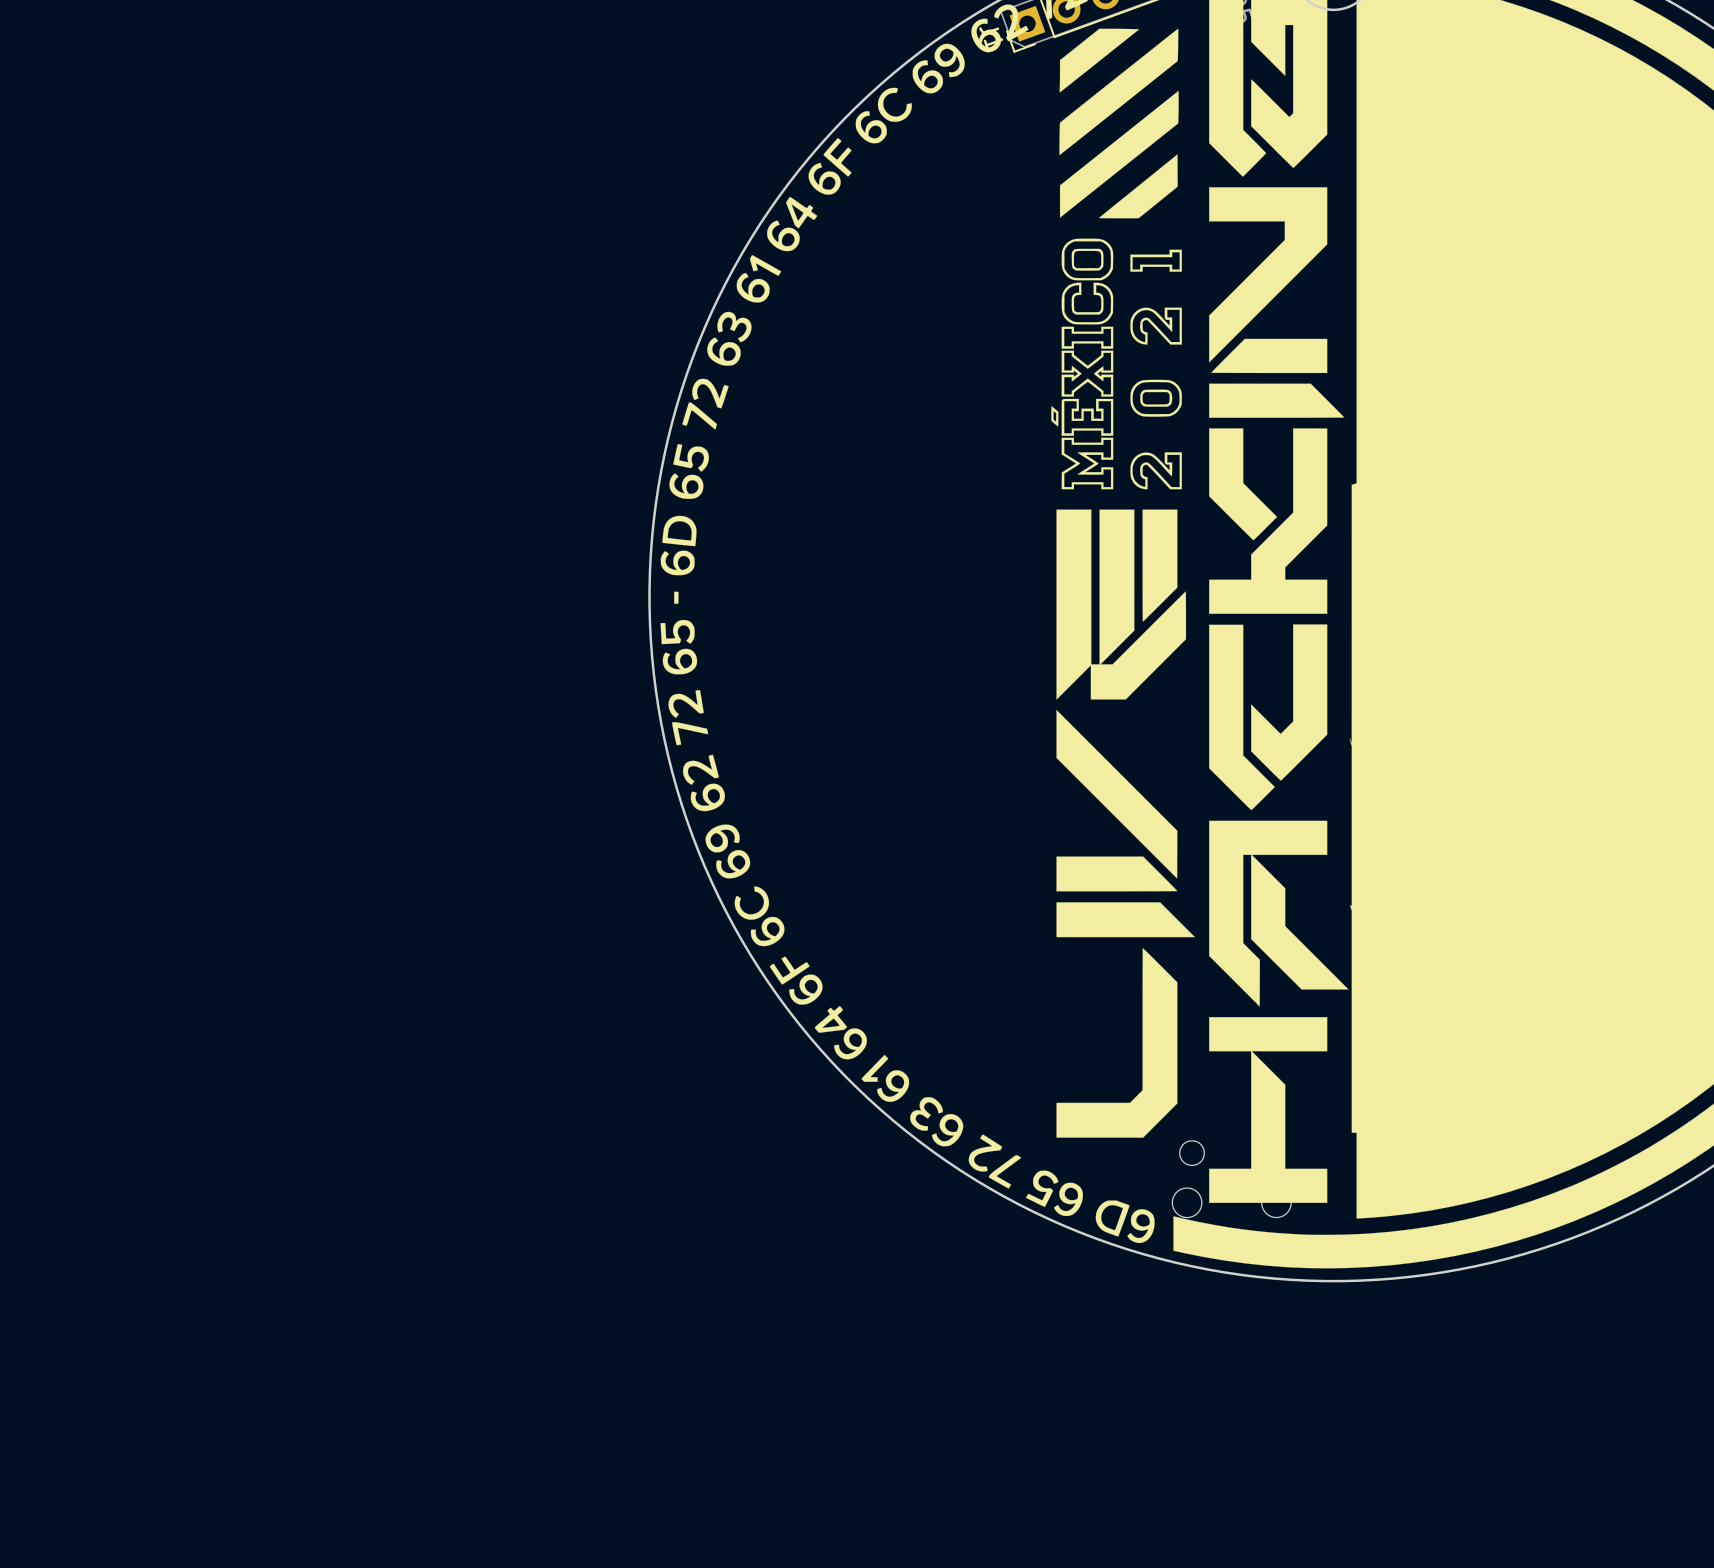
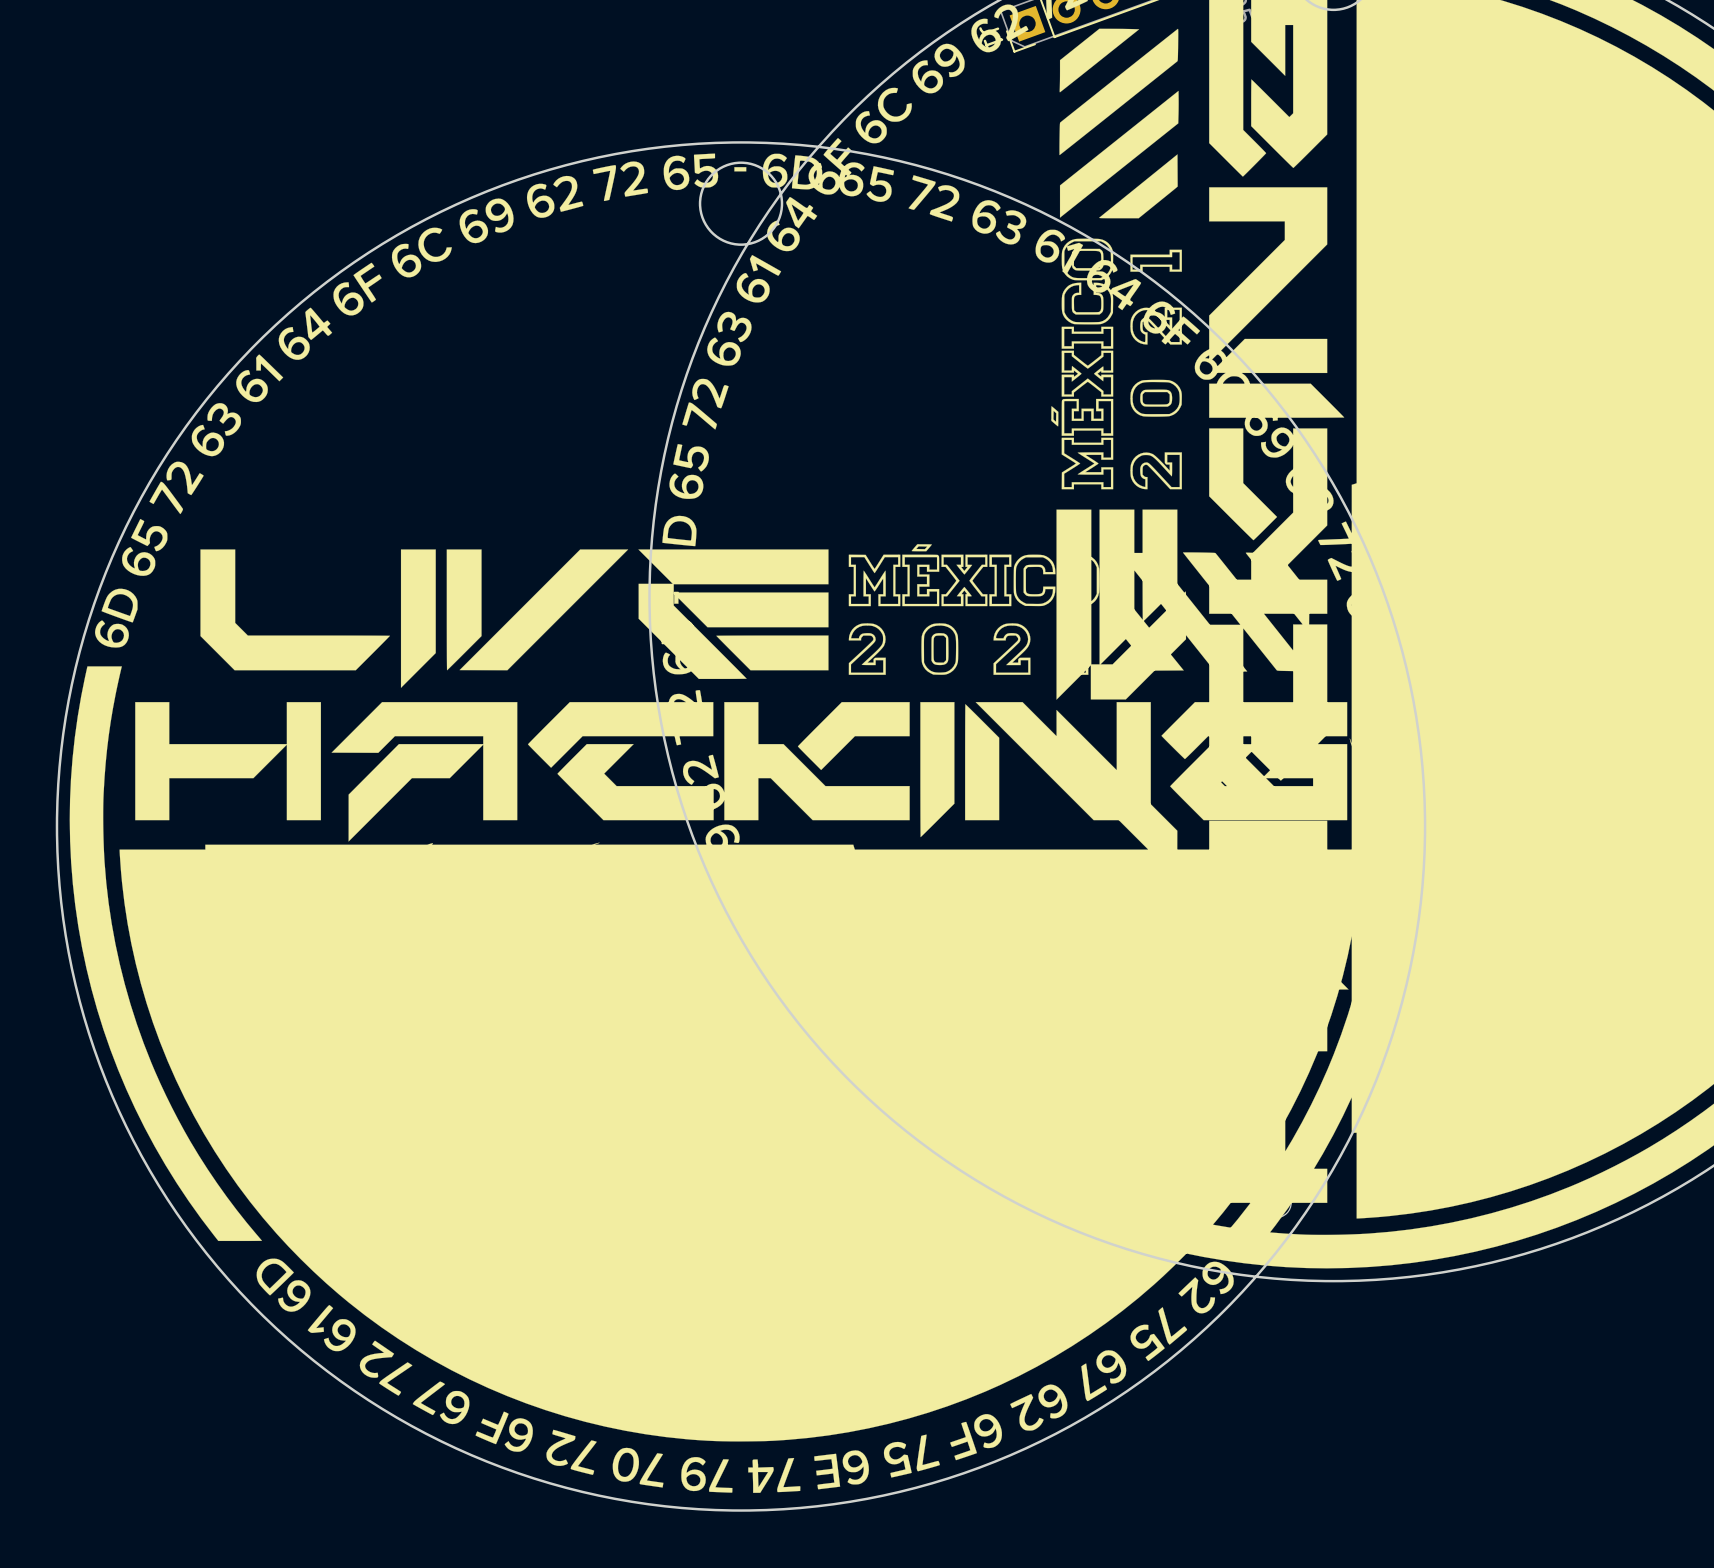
round board edge: none -> [55, 141, 1427, 1512]
drawing: none -> [69, 153, 1412, 1493]
round board edge: none -> [698, 161, 784, 246]

